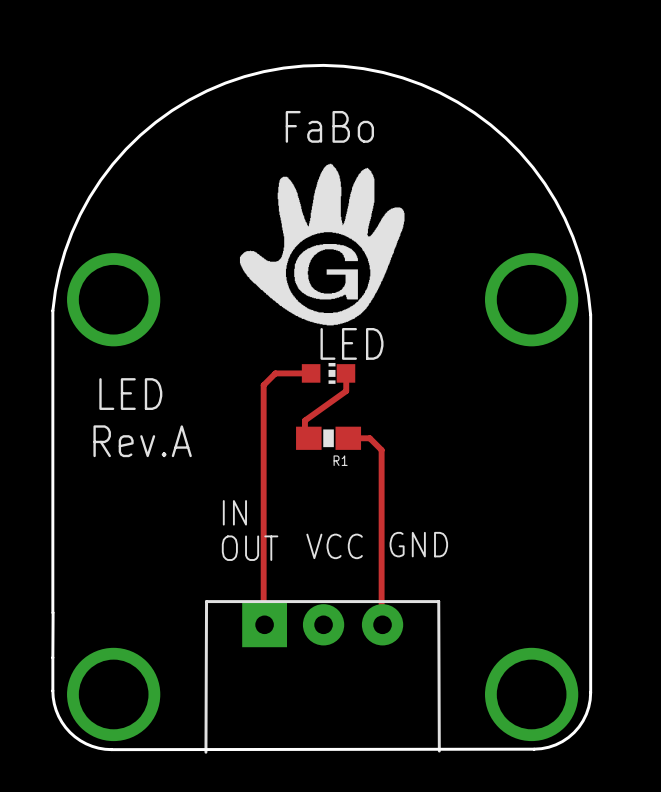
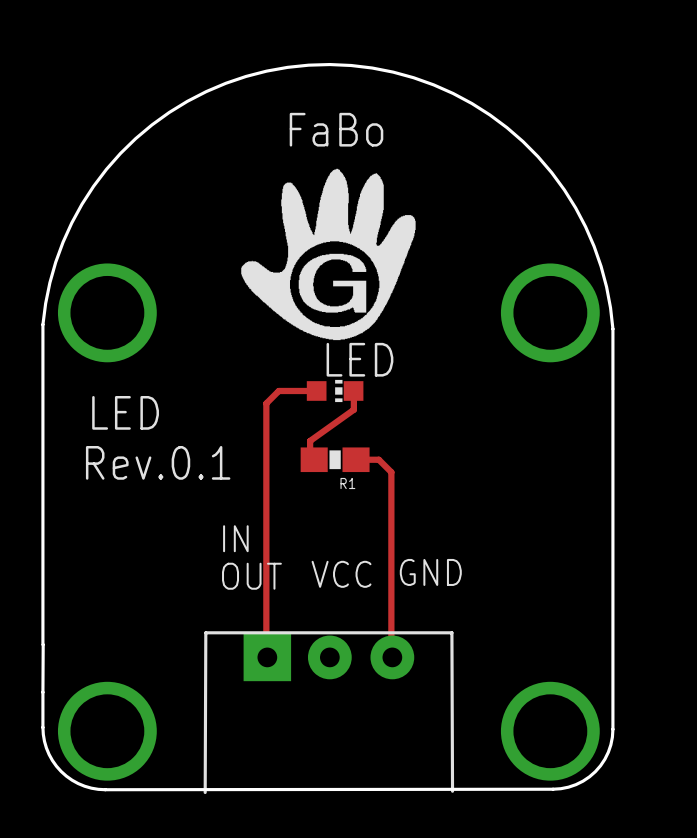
text: Rev.A (142, 441) -> Rev.0.1 (158, 462)

